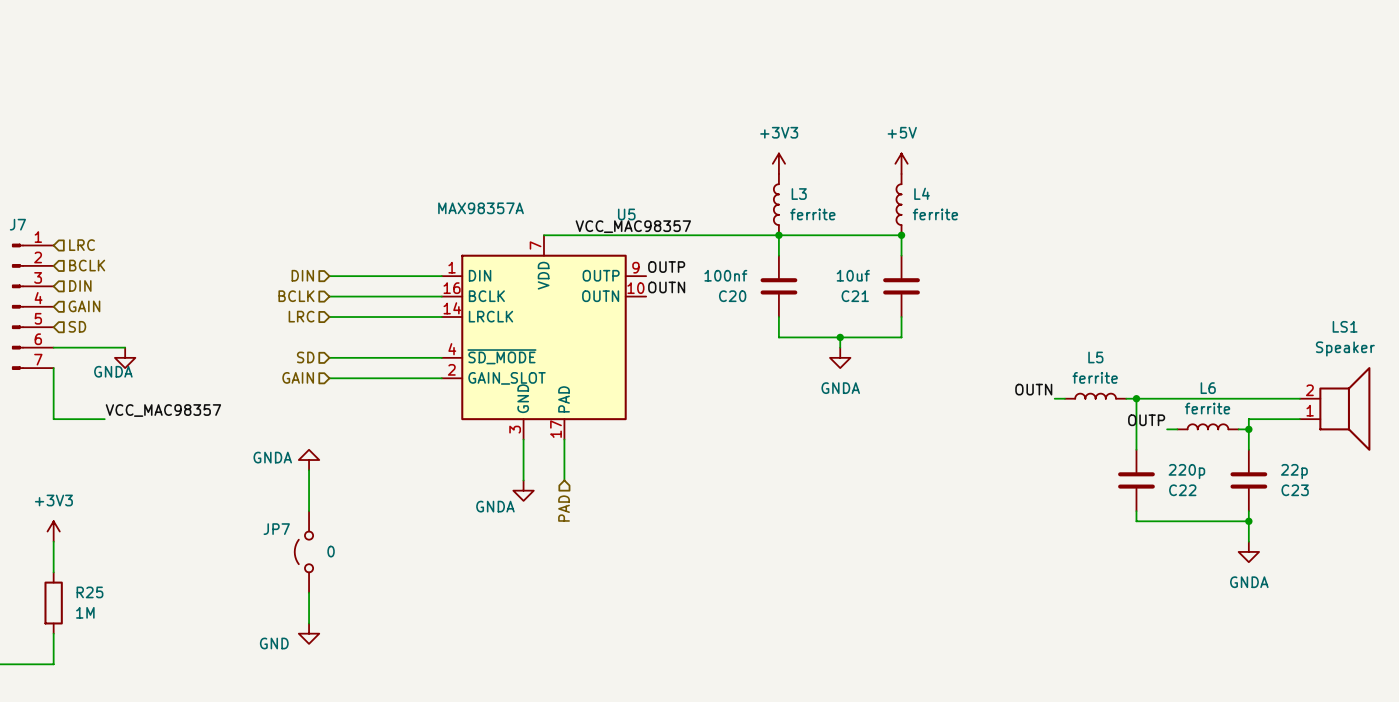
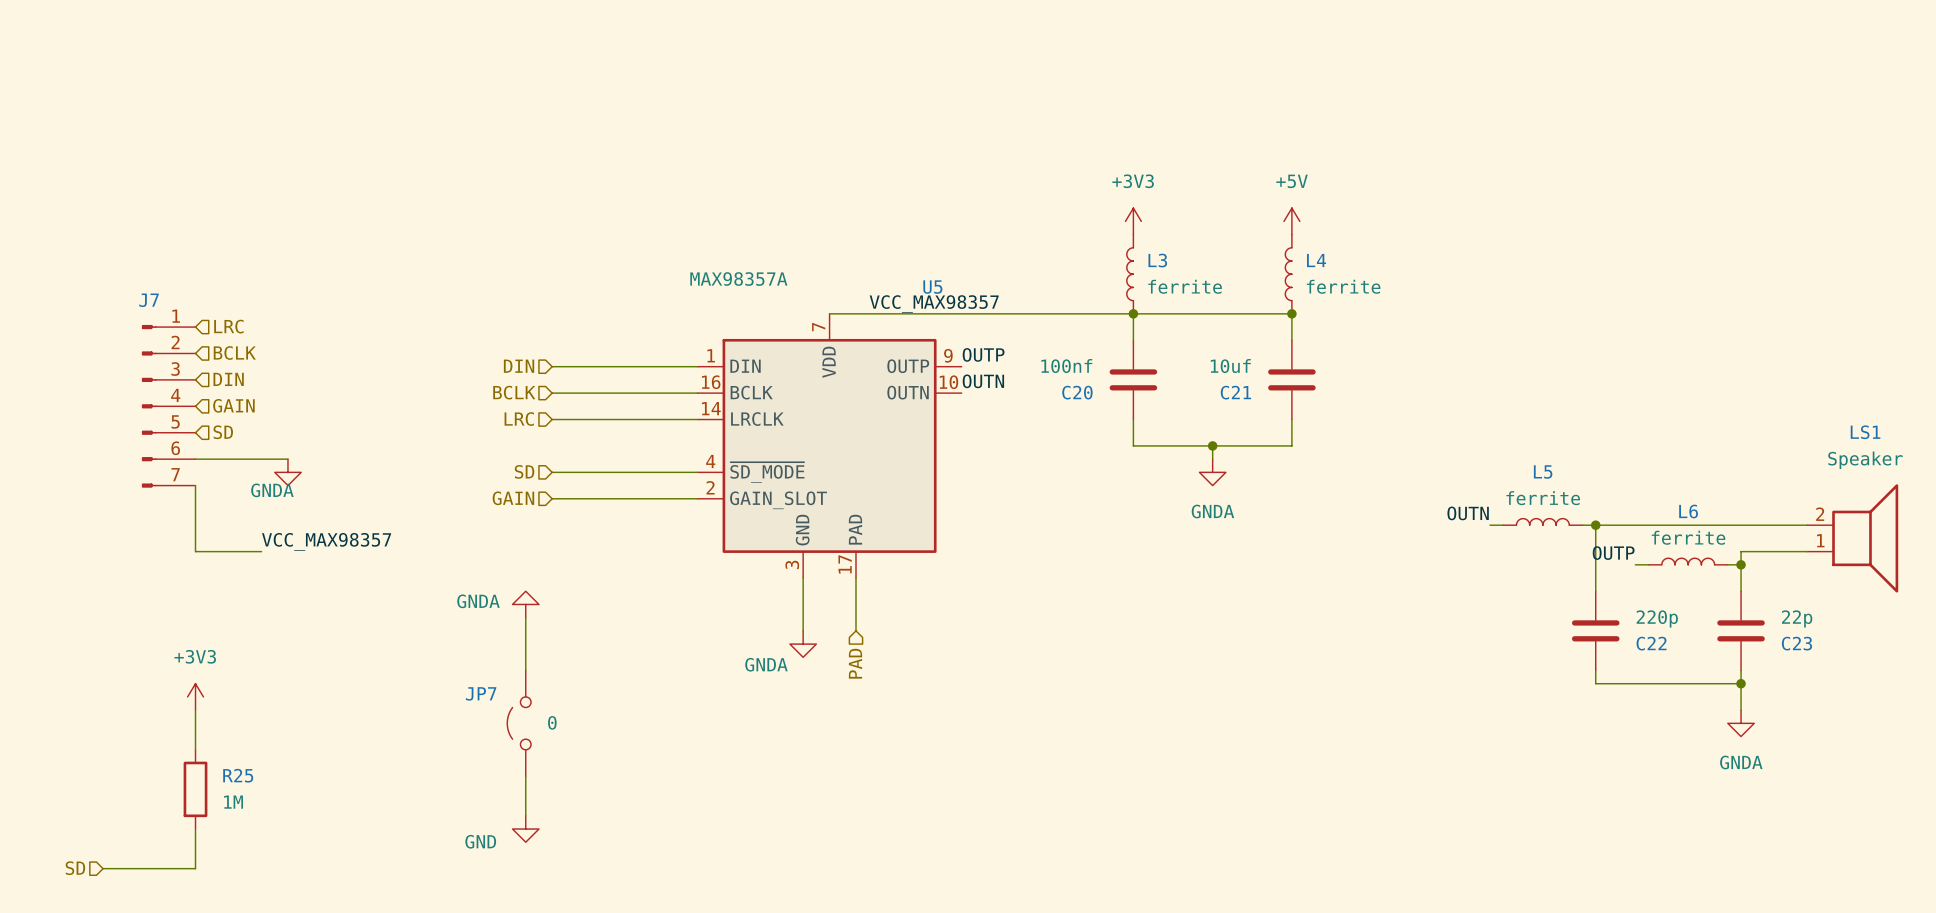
label: VCC_MAC98357 (633, 226) -> VCC_MAX98357 (934, 304)
label: VCC_MAC98357 (163, 410) -> VCC_MAX98357 (326, 541)

